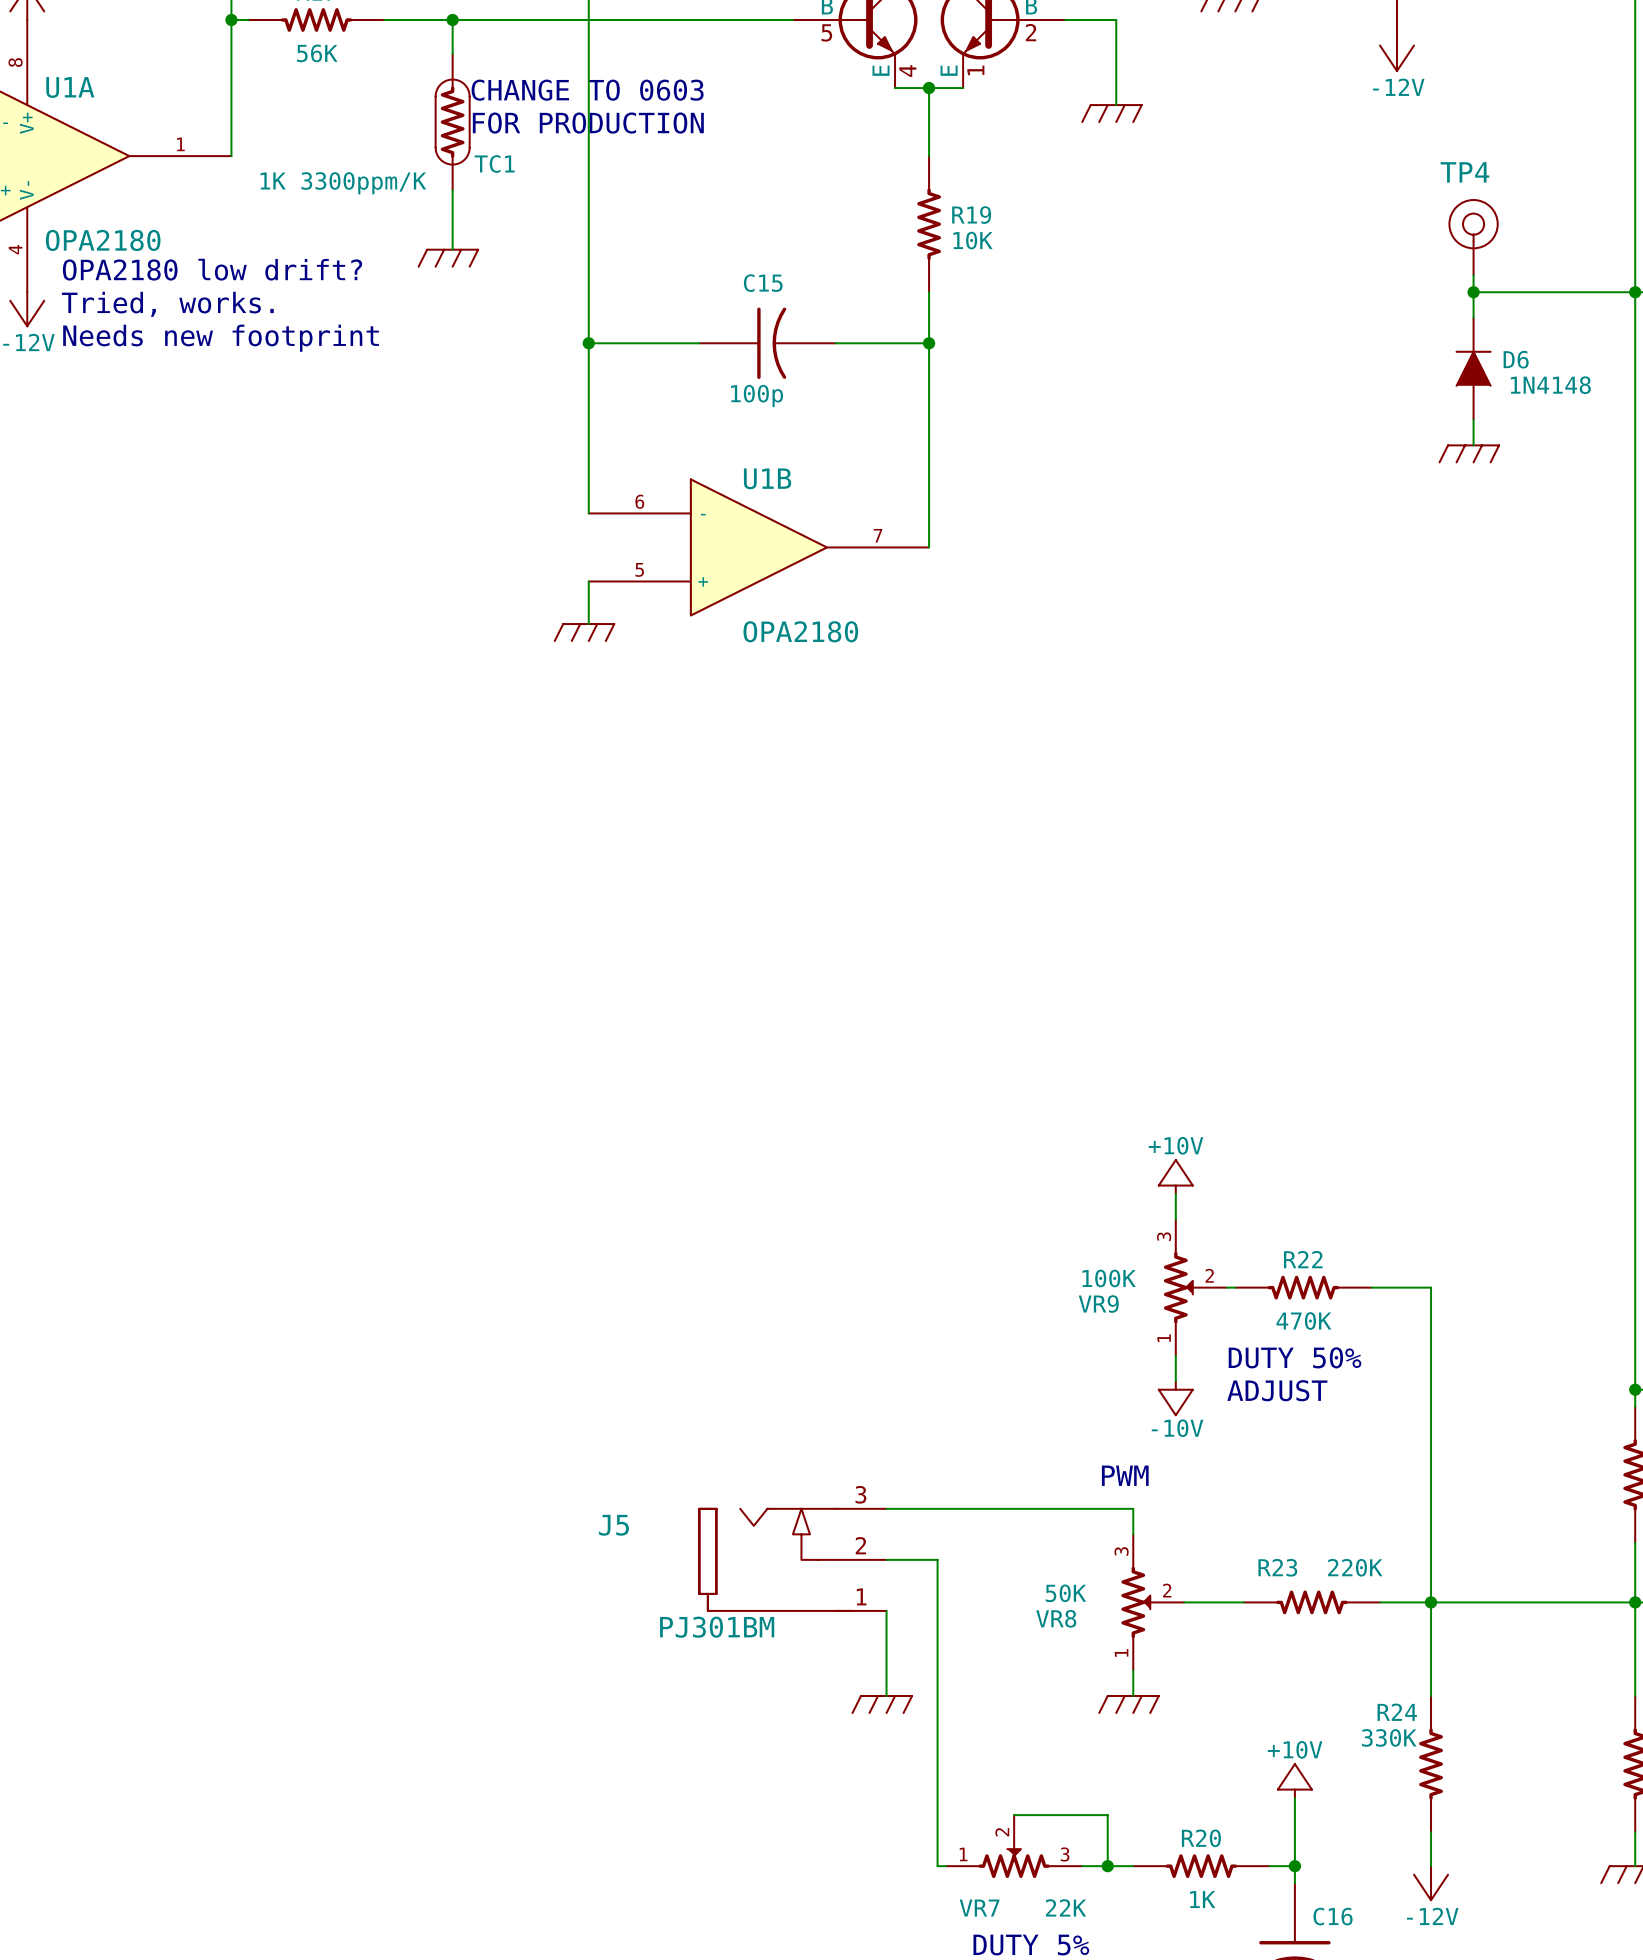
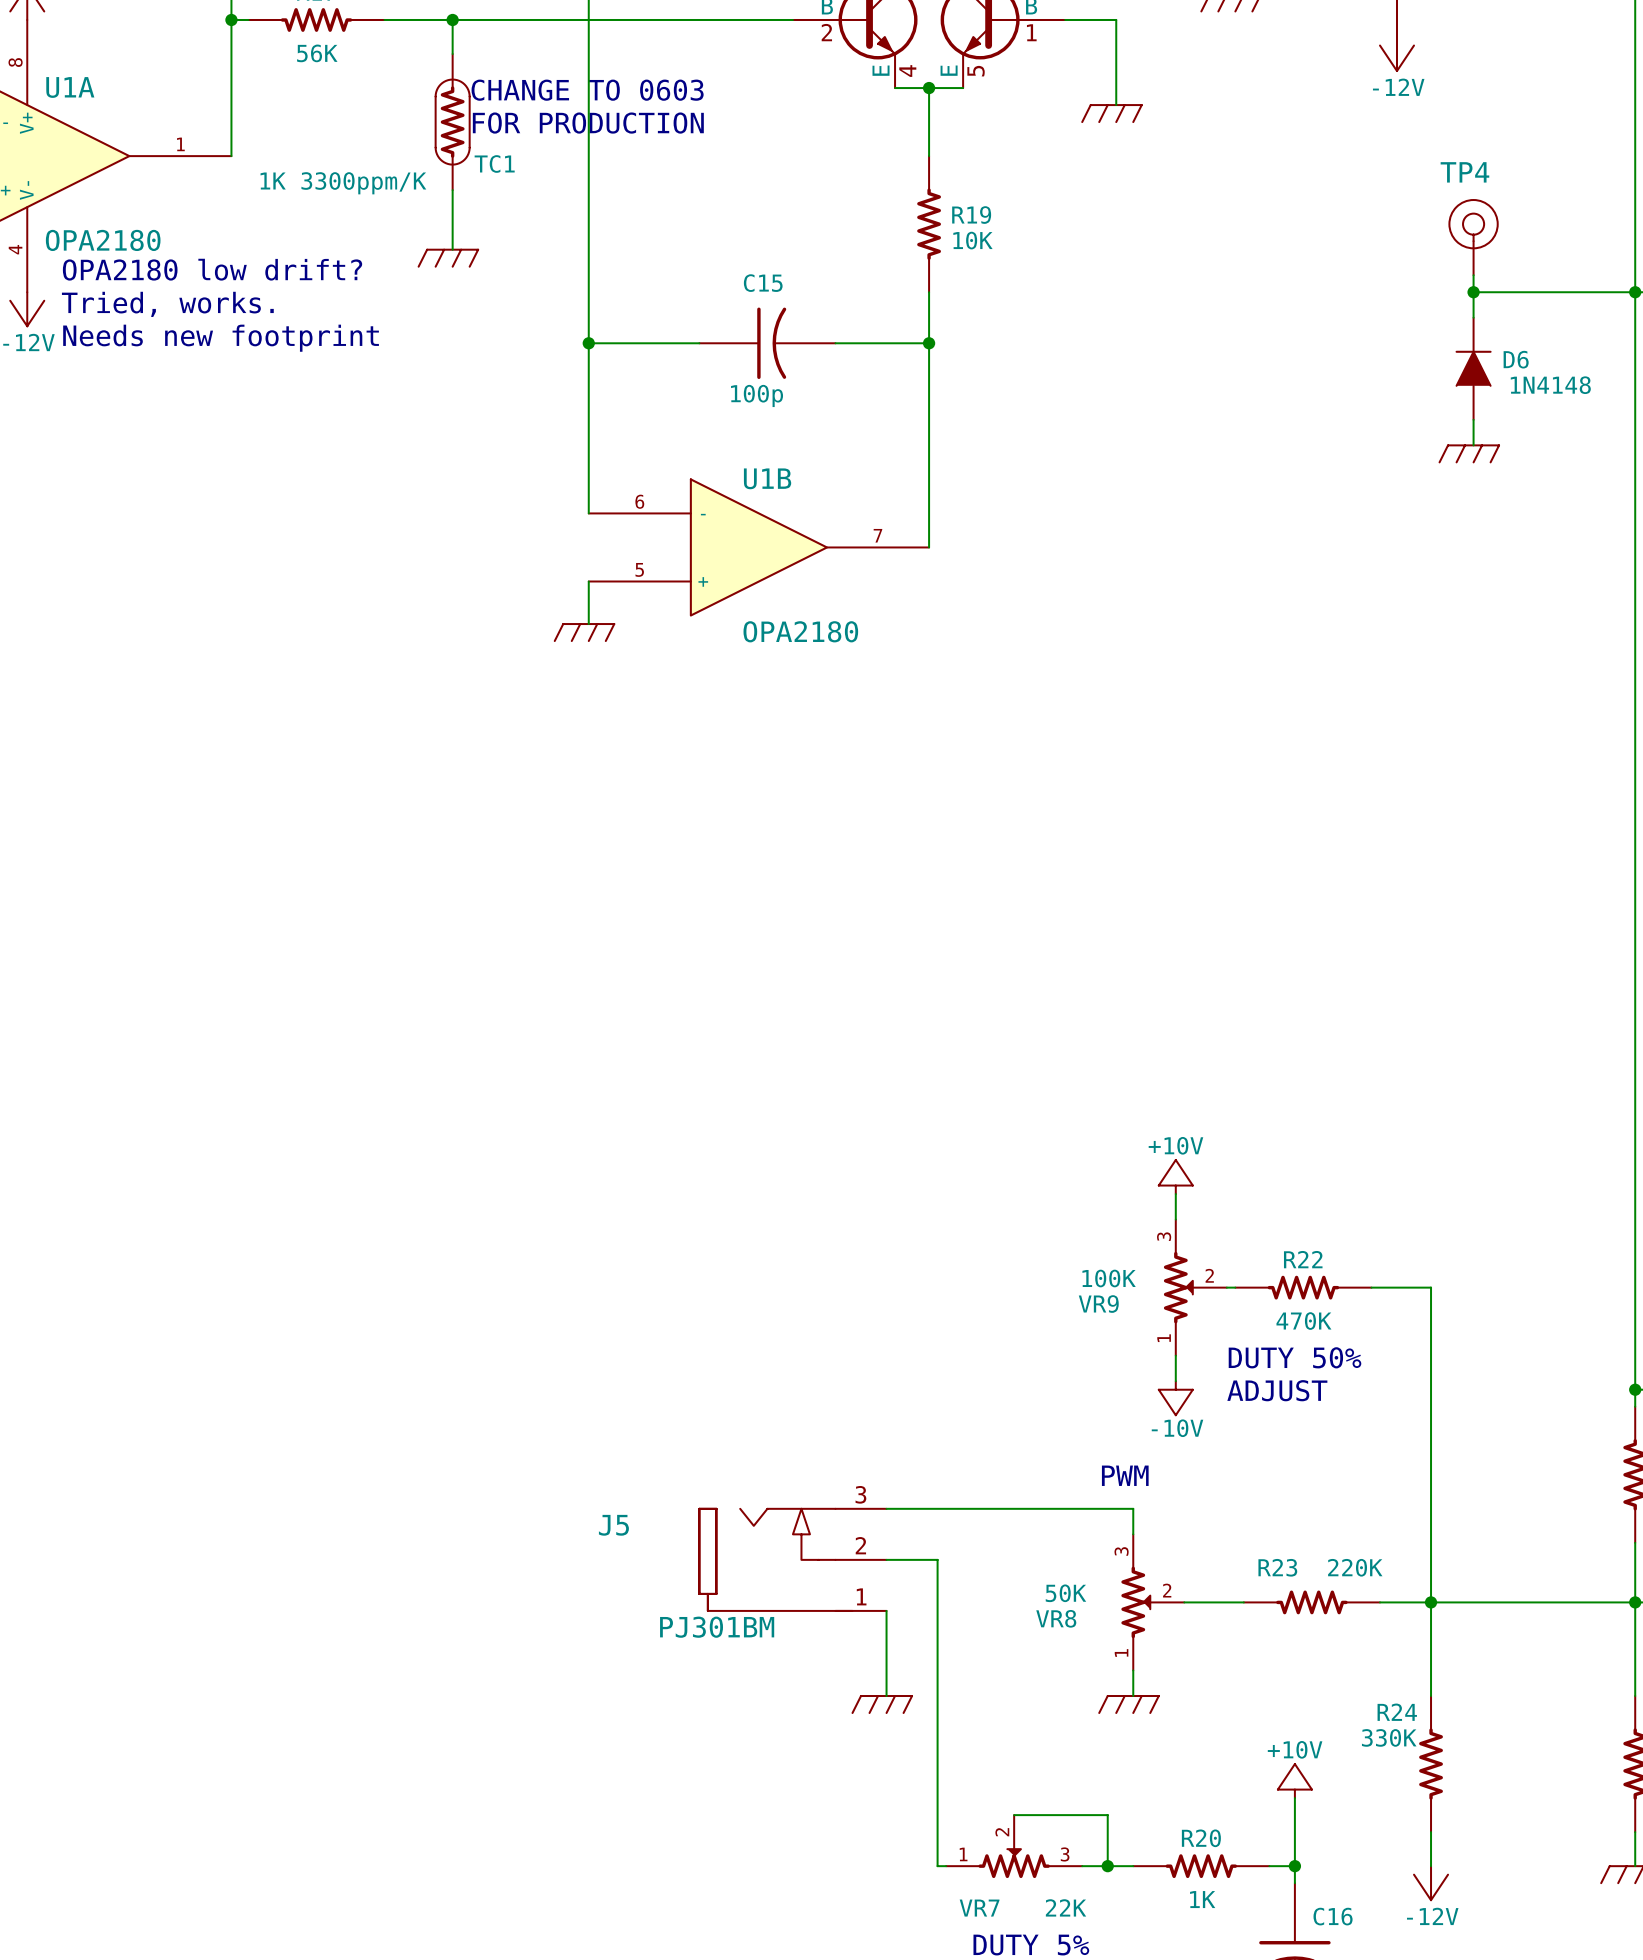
part pin number: 5 (826, 32) -> 2 (826, 32)
part pin number: 2 (1031, 32) -> 1 (1031, 32)
part pin number: 1 (975, 70) -> 5 (976, 71)

